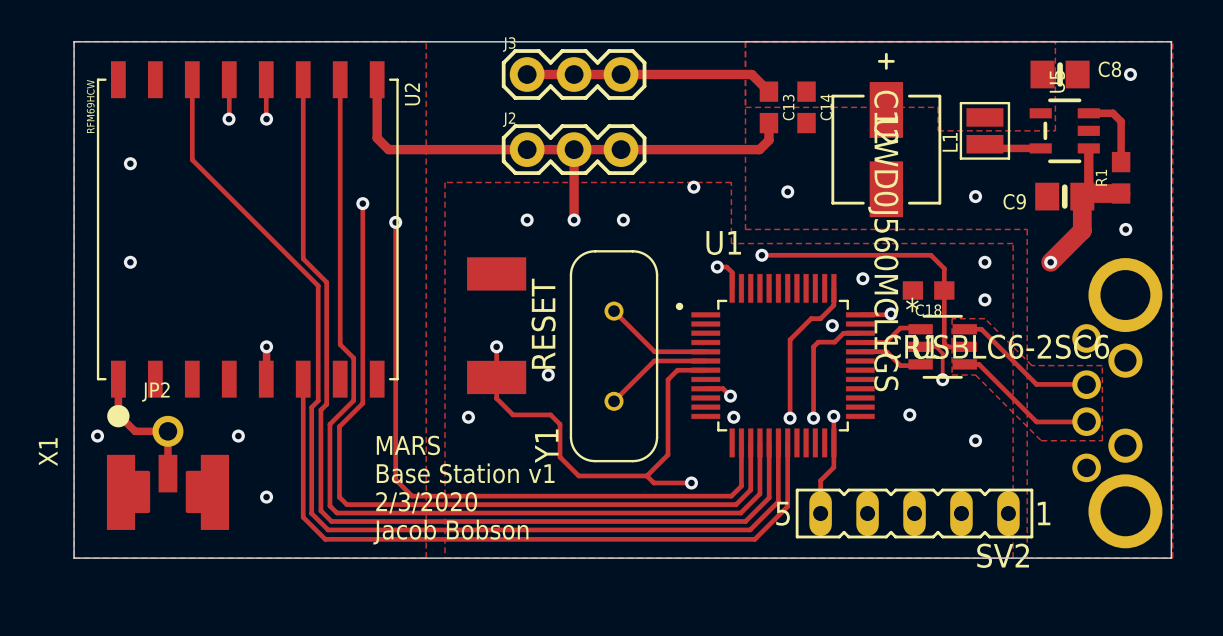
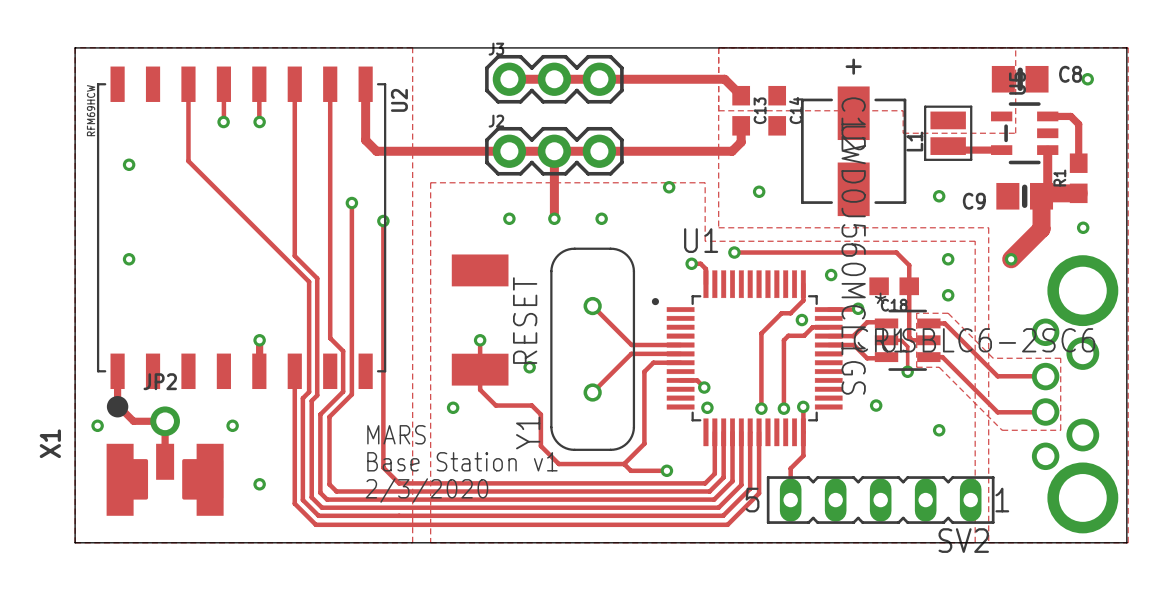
text: Jacob Bobson (450, 532) -> none

